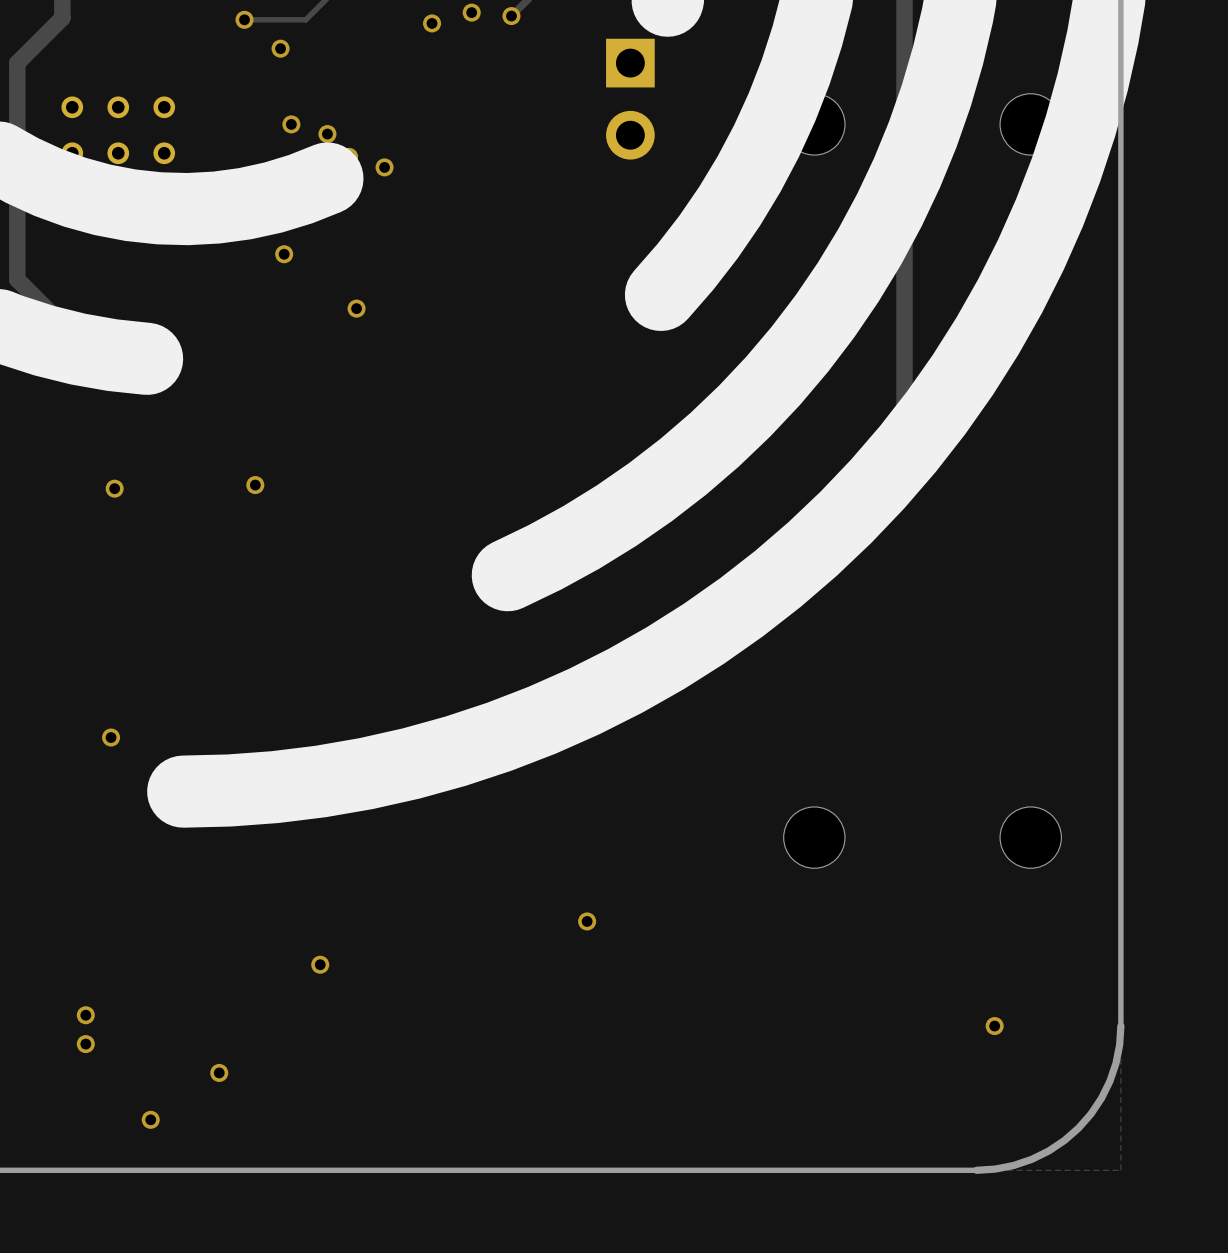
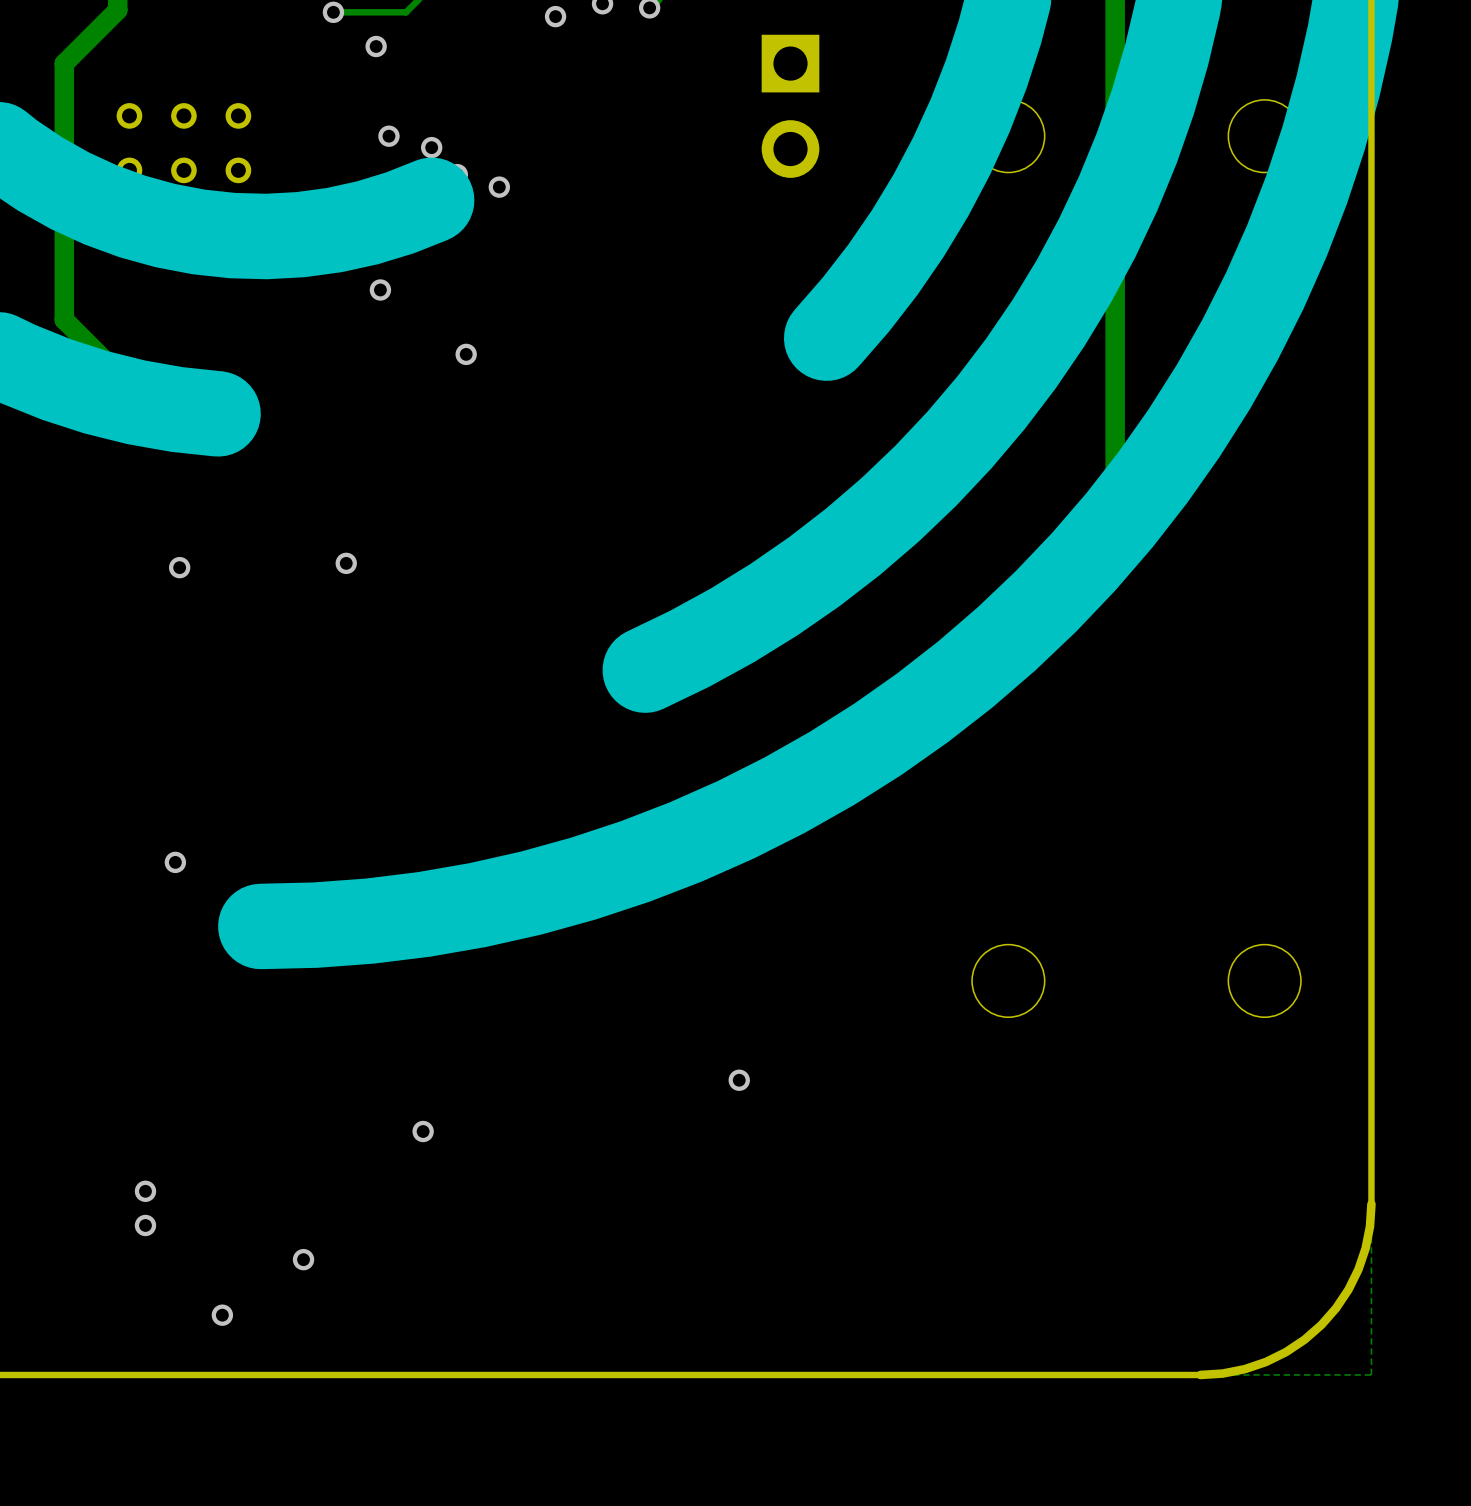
via: (994, 1026) -> none

